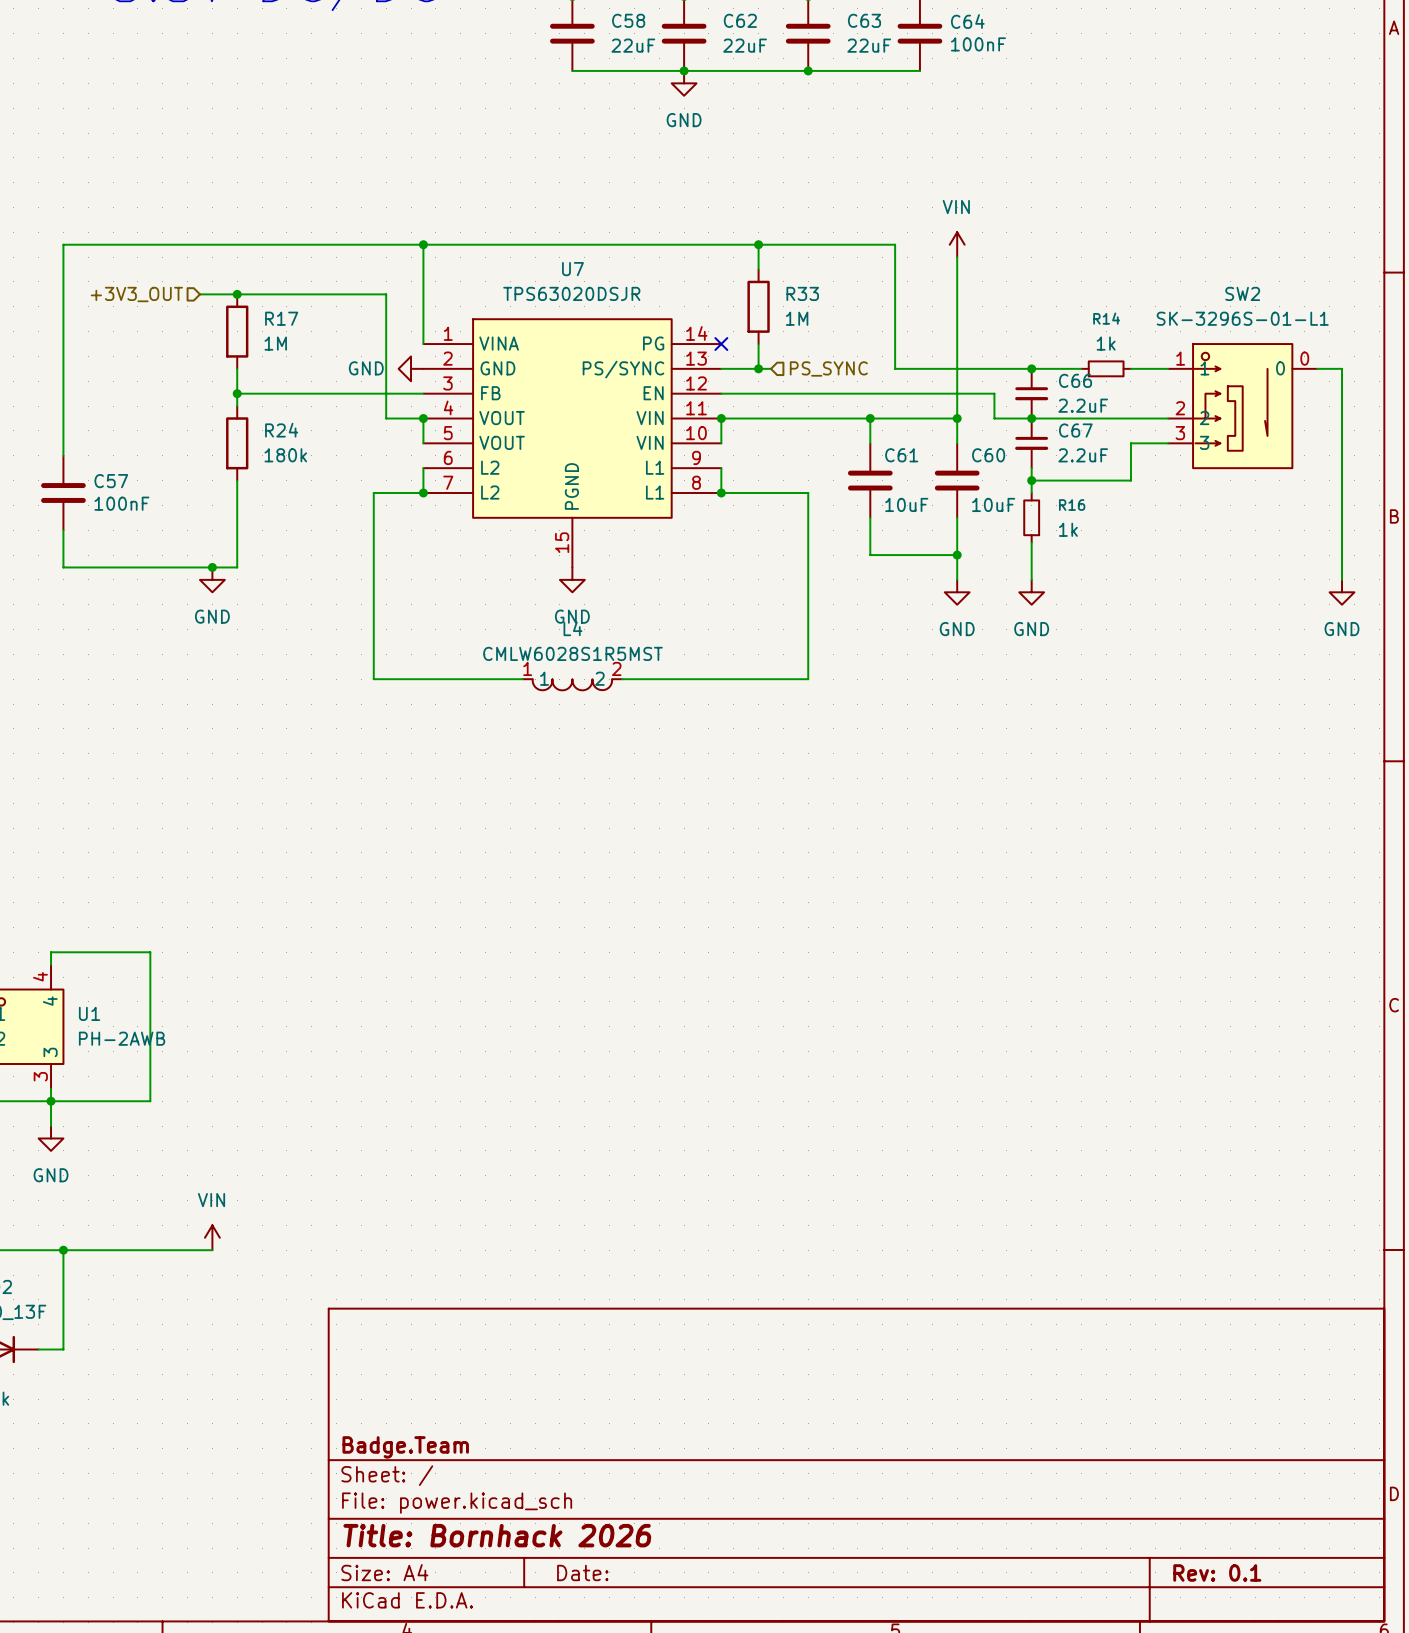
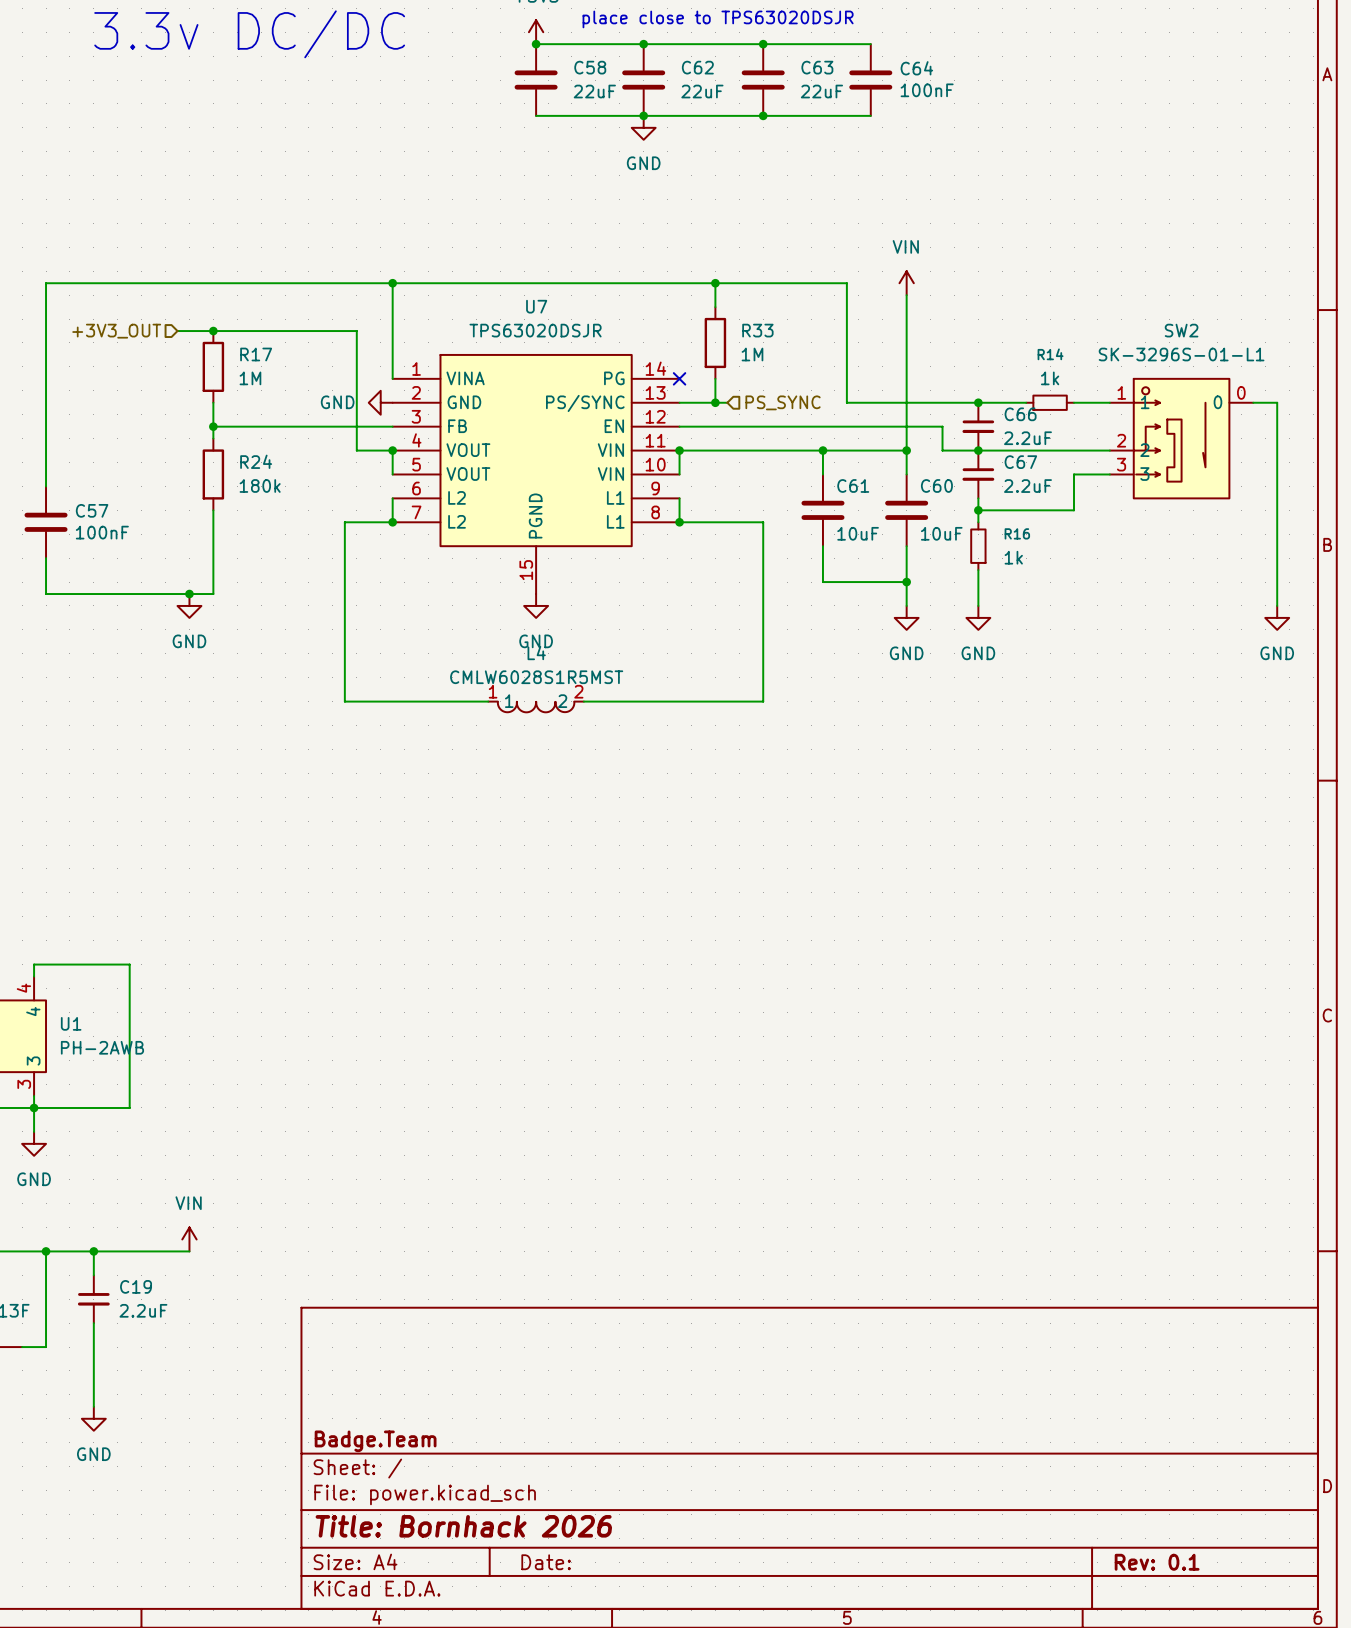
wire: none -> (93, 1251) (93, 1275)
junction: none -> (93, 1251)
C19: none -> 2.2uF (93, 1299)
wire: none -> (93, 1323) (93, 1406)
power symbol: none -> GND (93, 1418)

